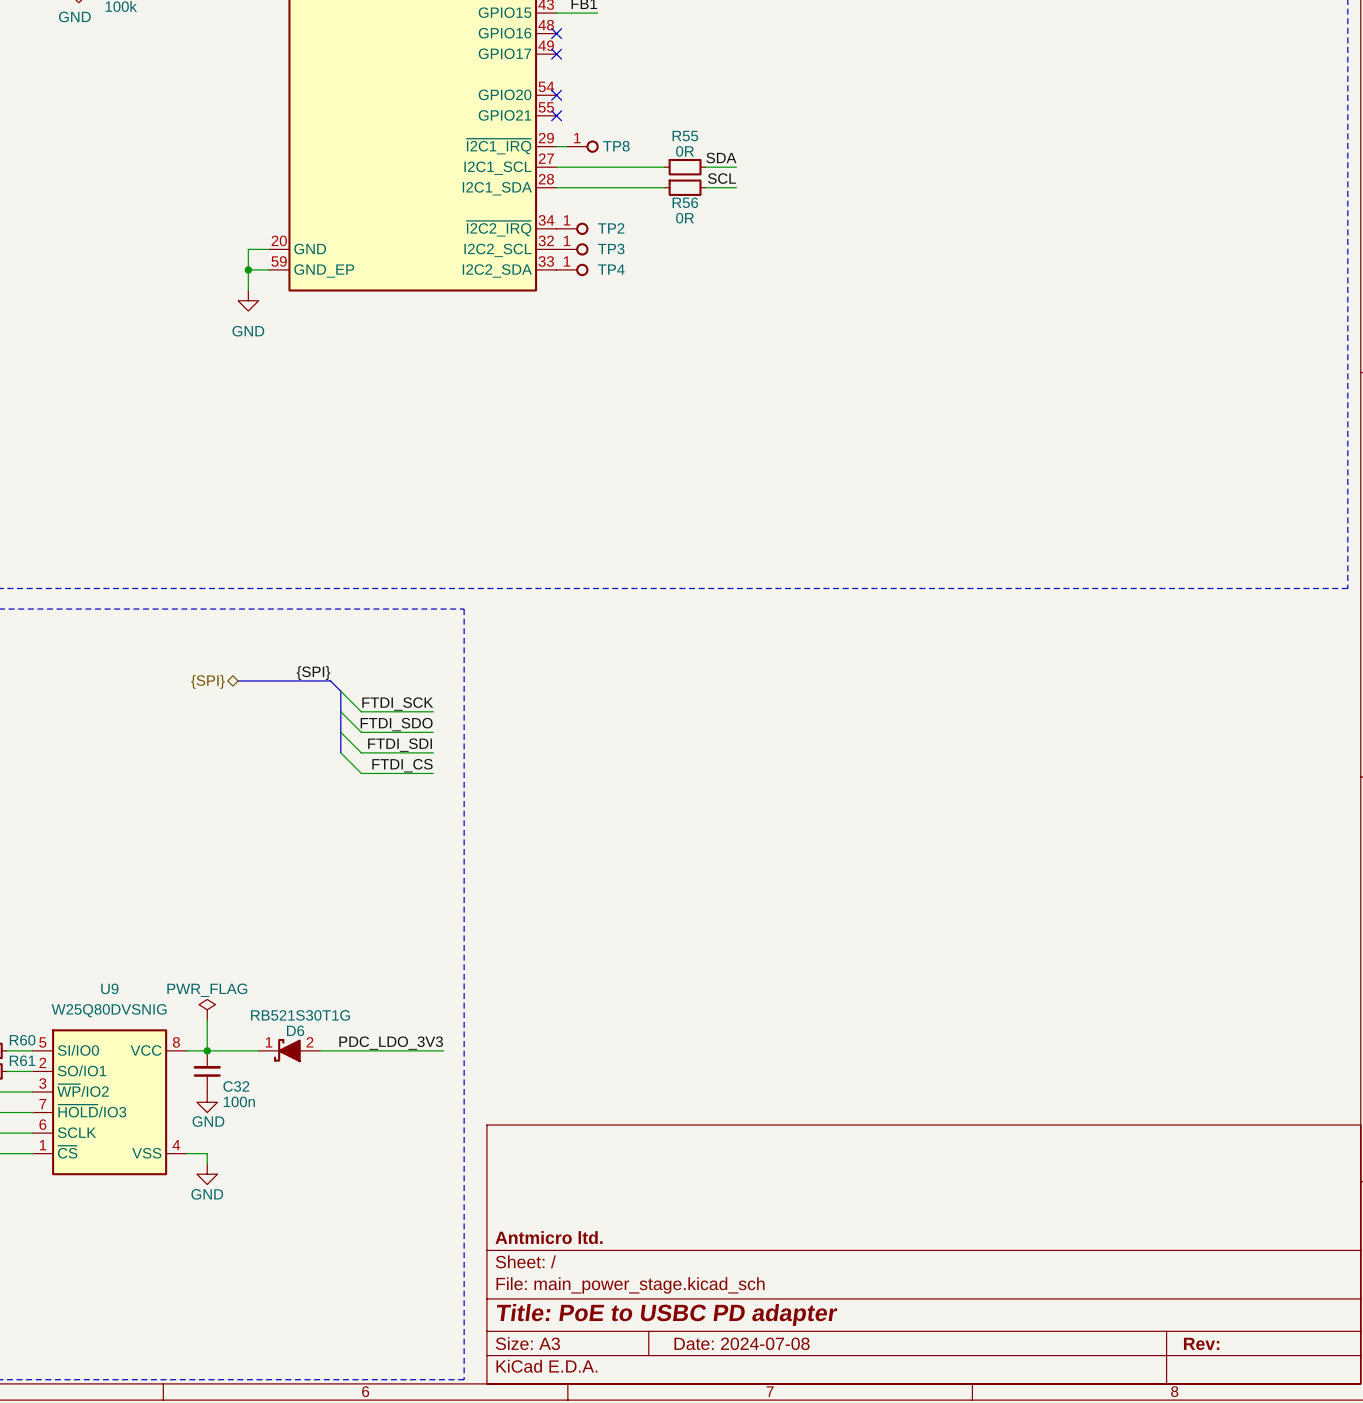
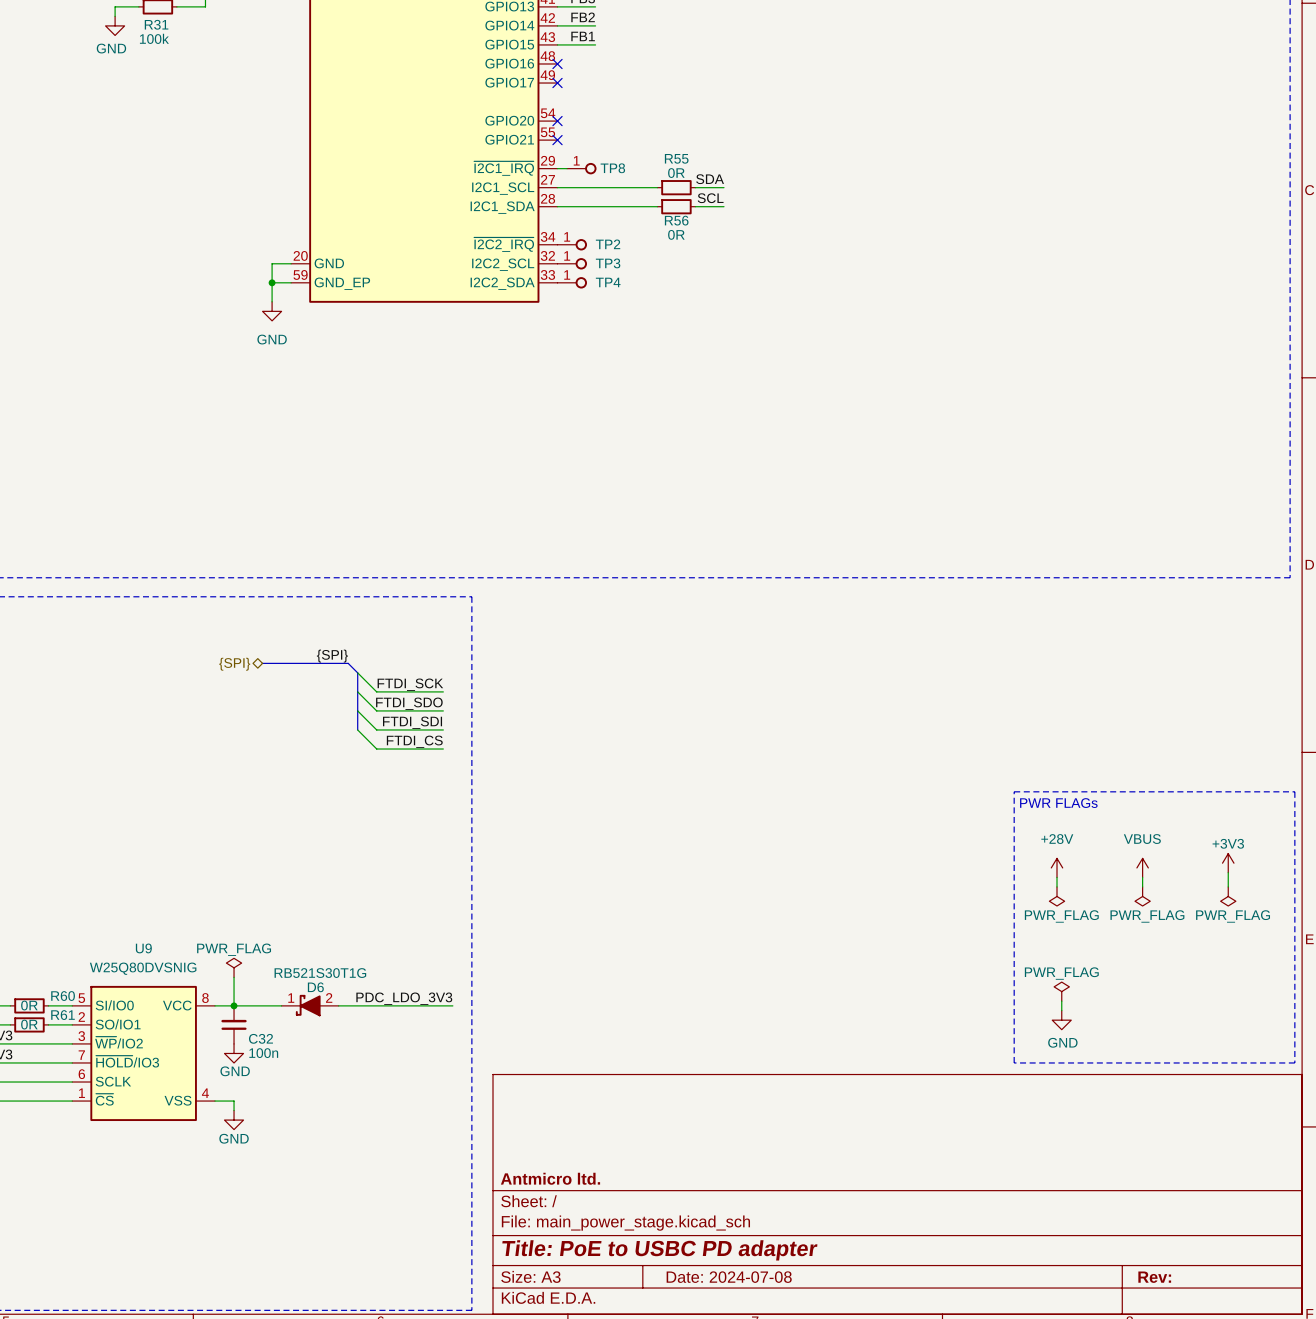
line: none -> (1014, 791) (1294, 791) (1294, 1062) (1014, 1062) (1014, 791)
text: none -> PWR FLAGs (1058, 803)
power symbol: none -> +3V3 (1228, 863)
power symbol: none -> +28V (1057, 867)
power symbol: none -> VBUS (1142, 867)
wire: none -> (1228, 872) (1228, 886)
wire: none -> (1057, 877) (1057, 886)
wire: none -> (1142, 877) (1142, 886)
power symbol: none -> PWR_FLAG (1057, 896)
power symbol: none -> PWR_FLAG (1142, 896)
power symbol: none -> PWR_FLAG (1228, 896)
power symbol: none -> PWR_FLAG (1061, 991)
wire: none -> (1061, 1001) (1061, 1010)
power symbol: none -> GND (1061, 1020)

